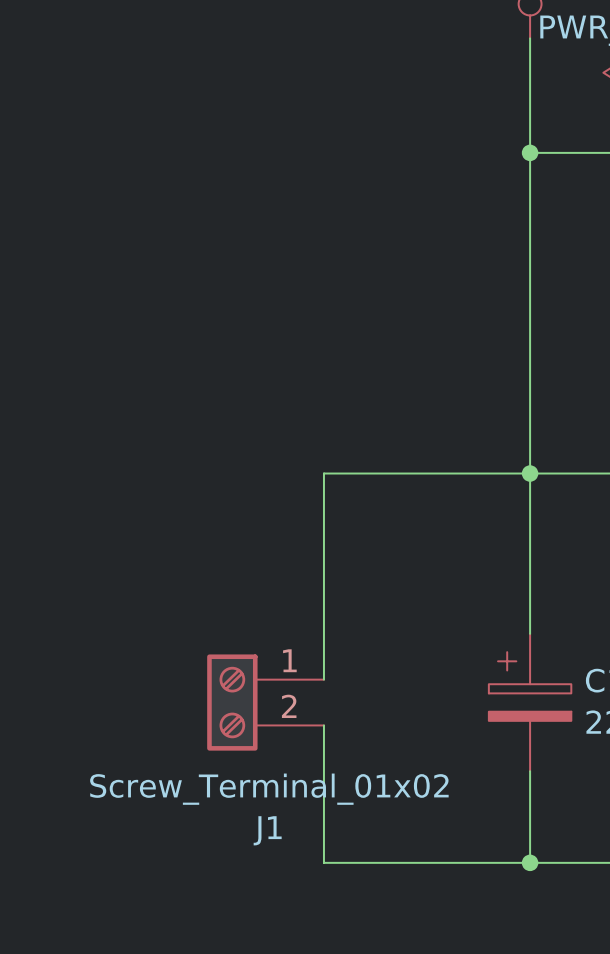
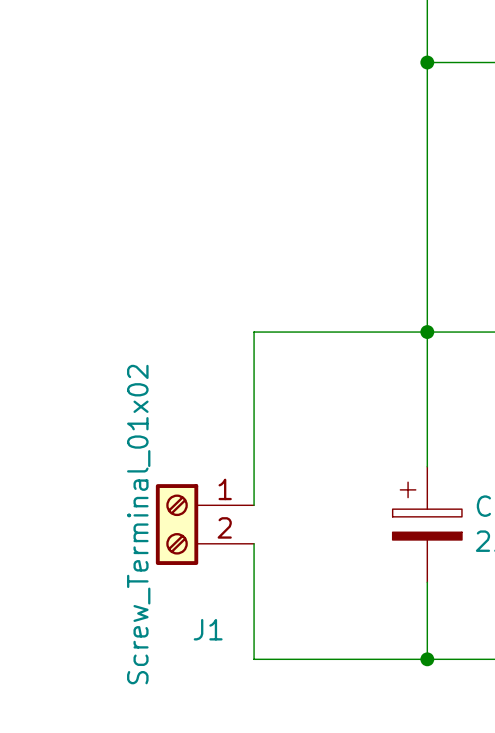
J1 value rotation: 0° (269, 789) -> 90° counterclockwise (138, 524)

